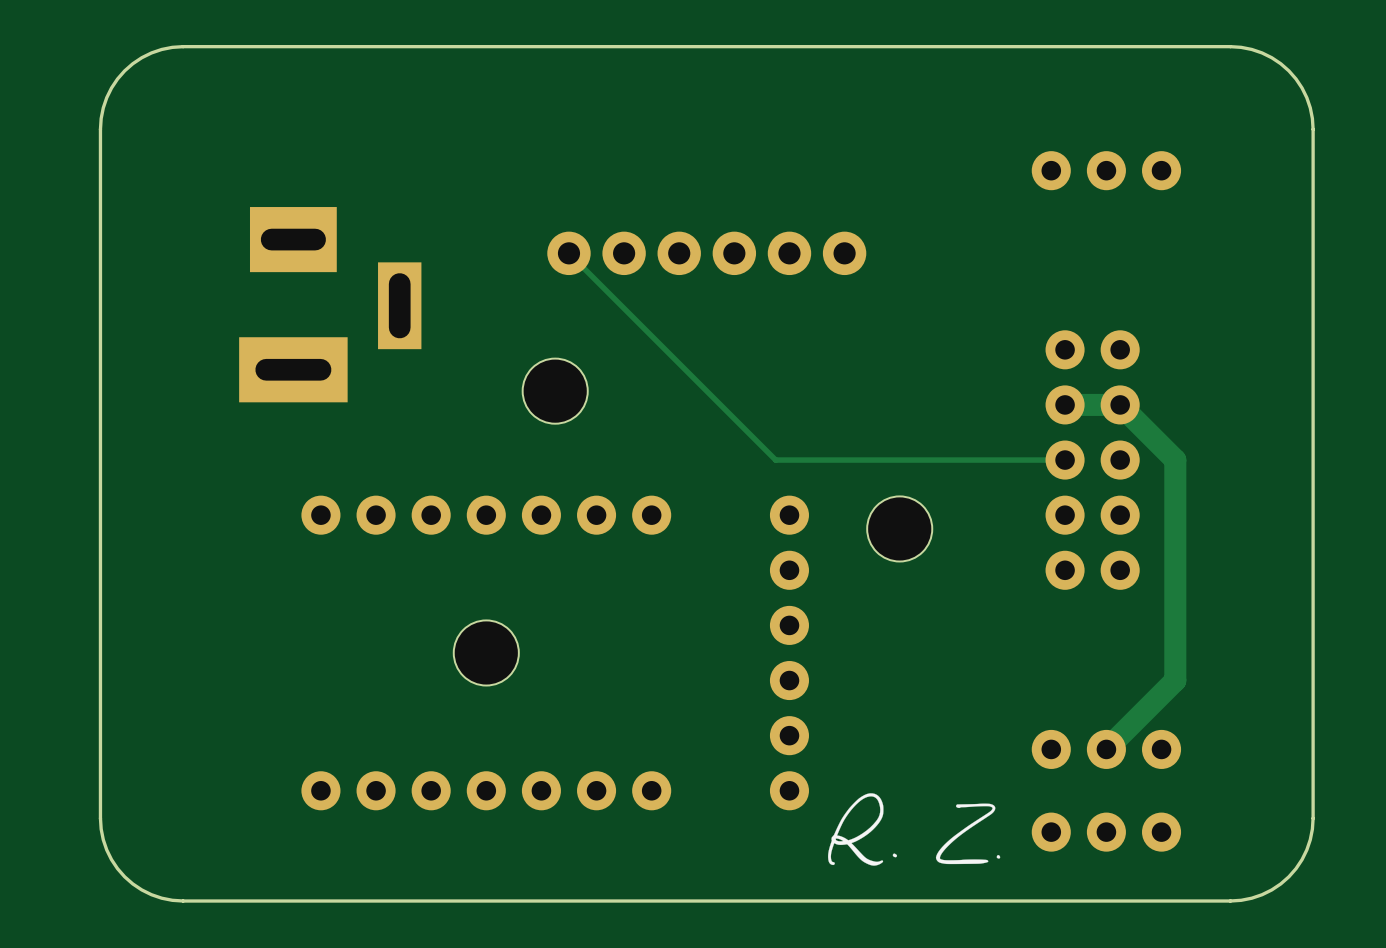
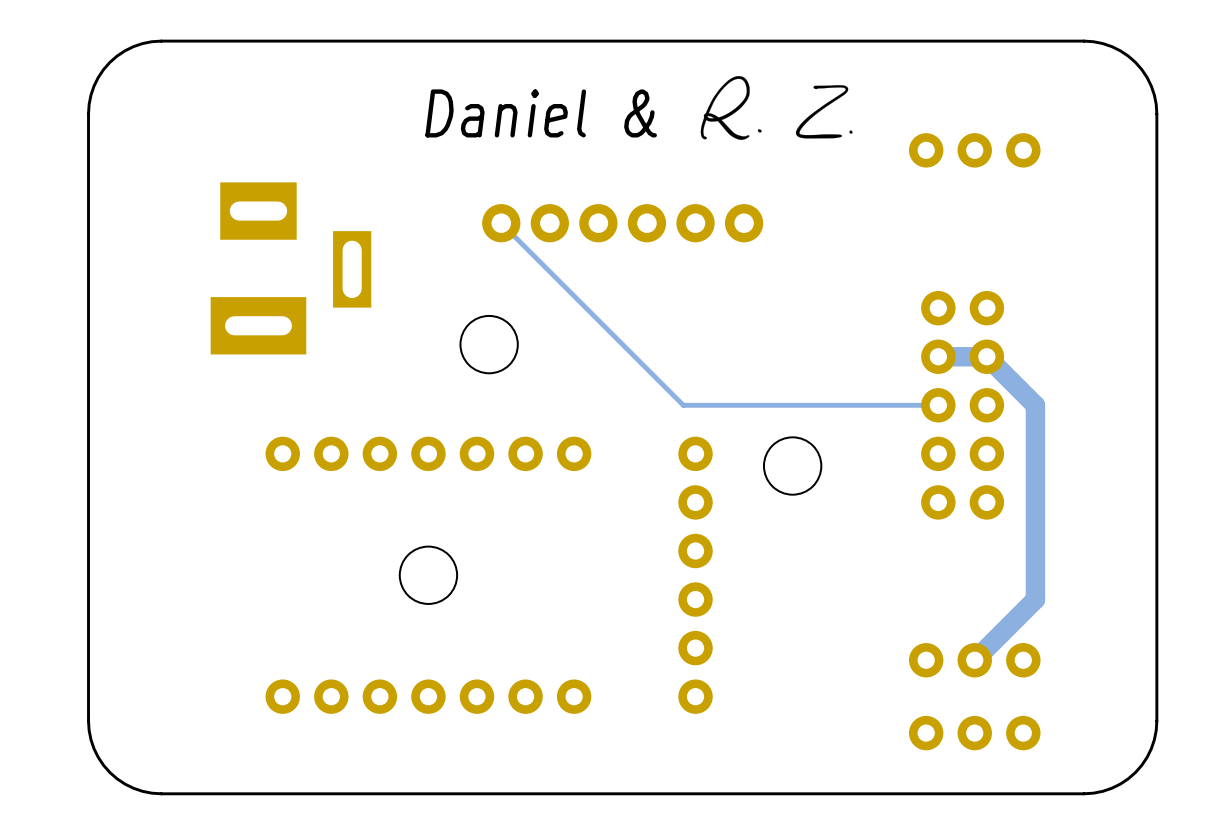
drawing: none -> [700, 76, 853, 140]
text: none -> Daniel & (541, 113)
drawing: [828, 793, 1001, 866] -> none

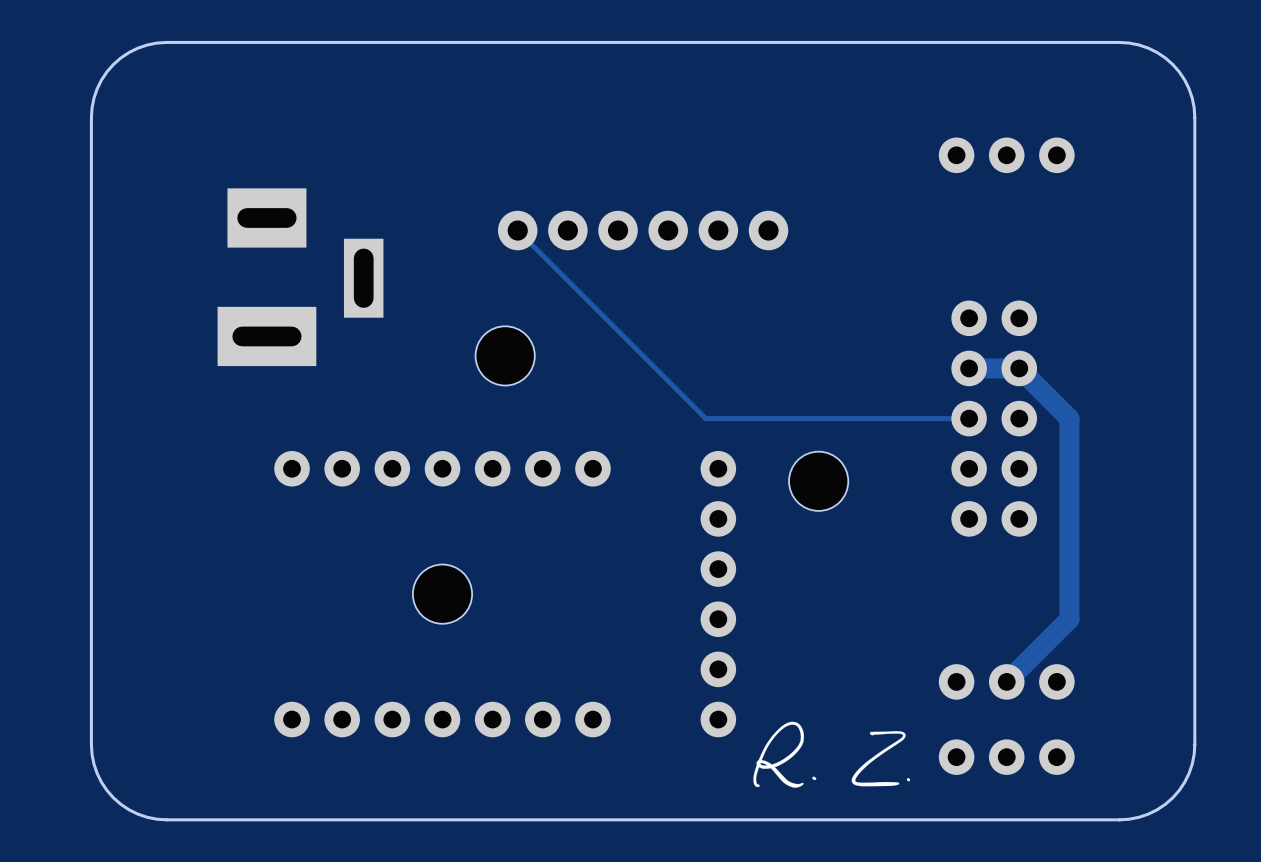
drawing: [700, 76, 853, 140] -> none
text: Daniel & (541, 113) -> none
drawing: none -> [753, 721, 911, 788]

